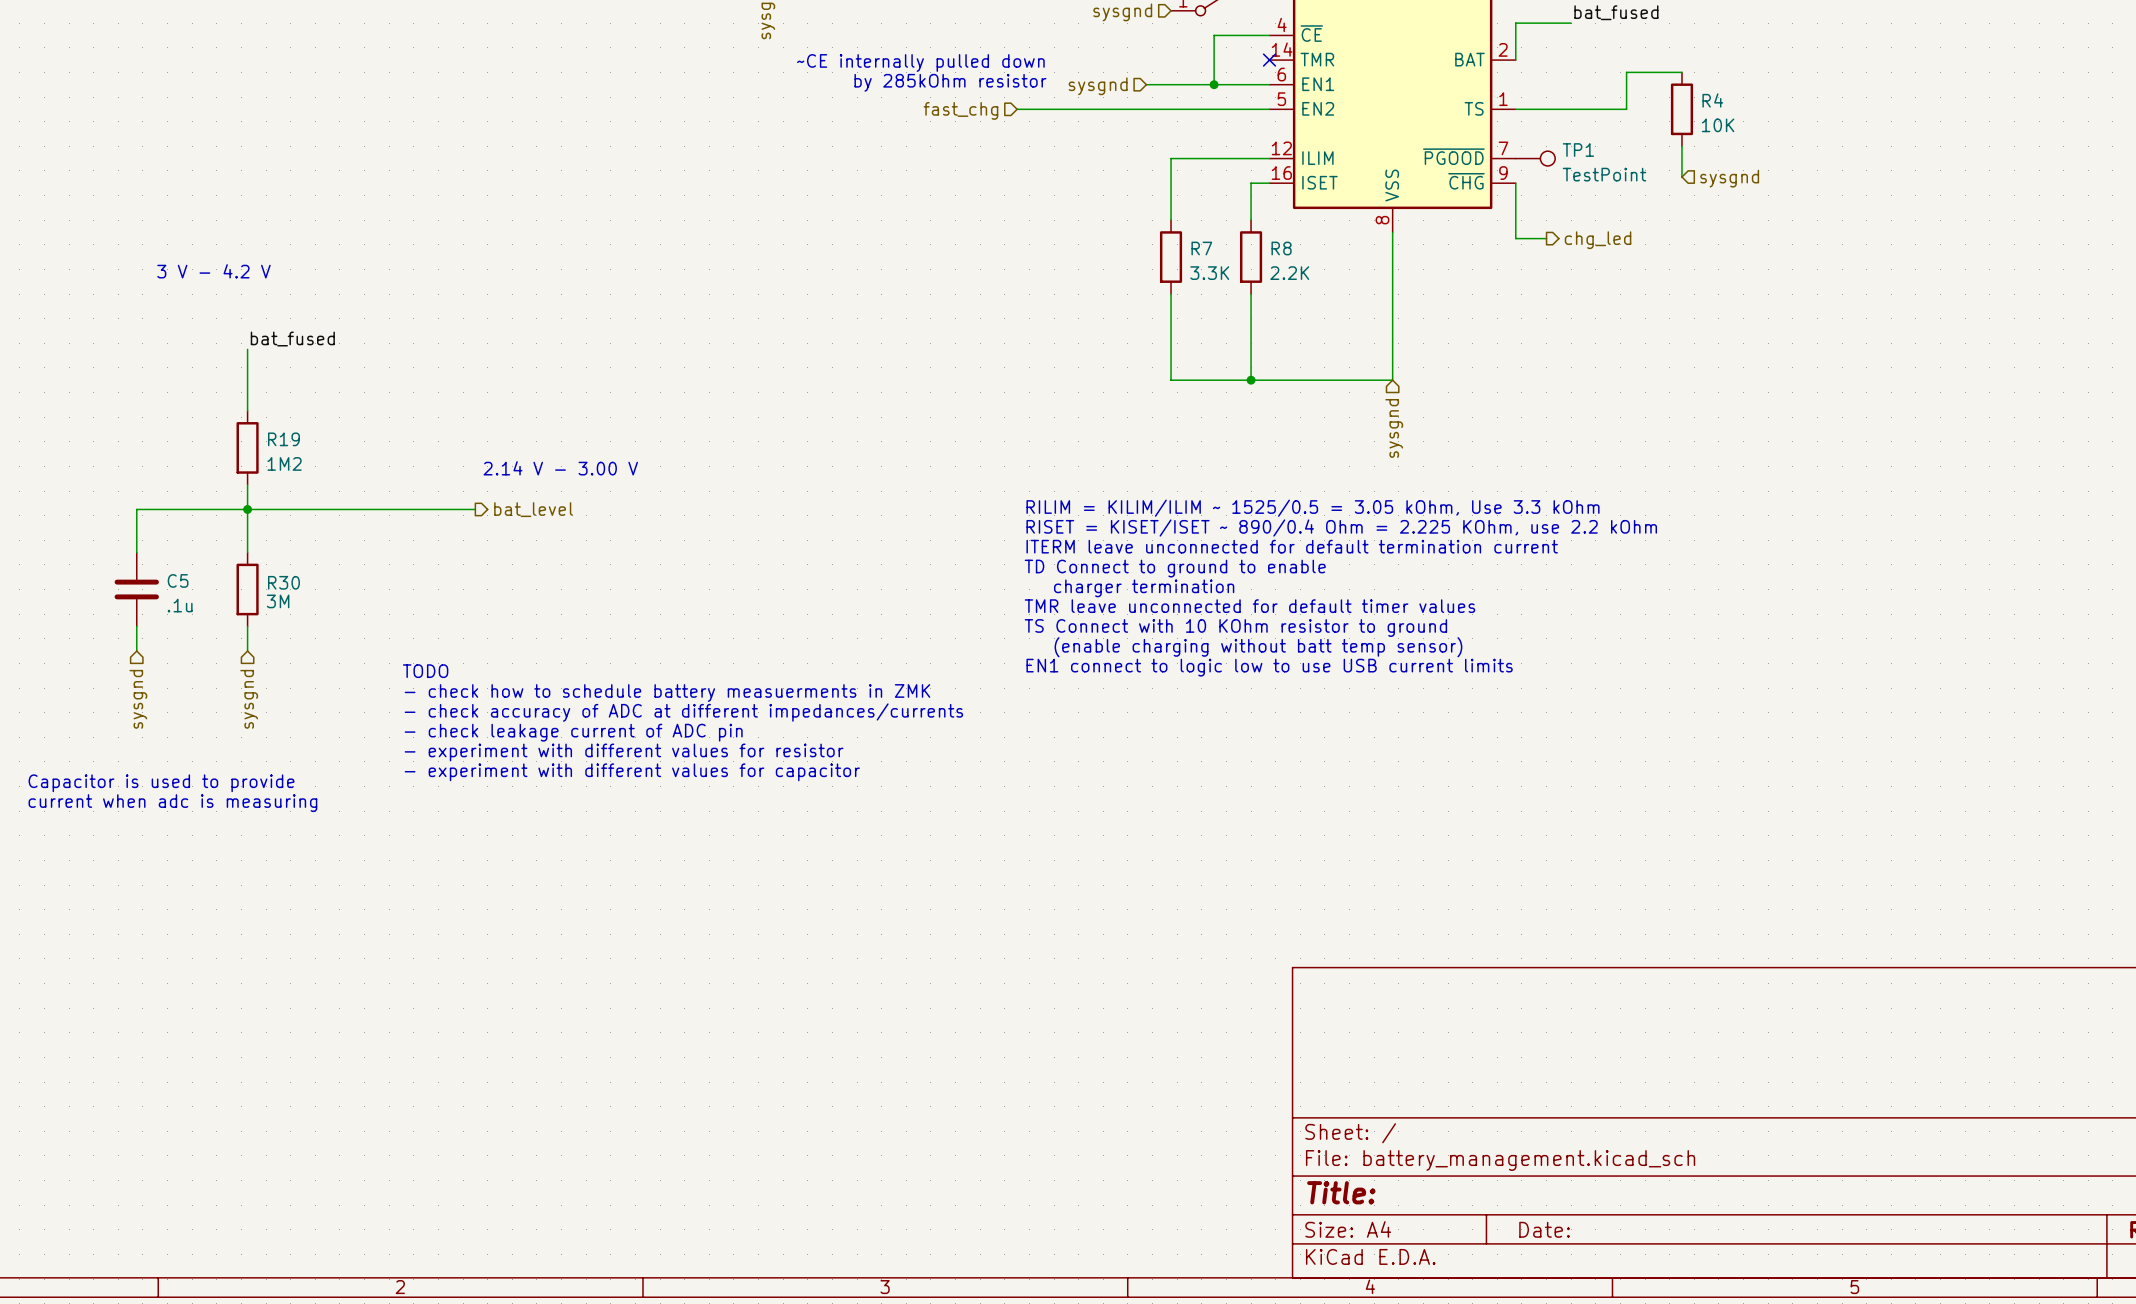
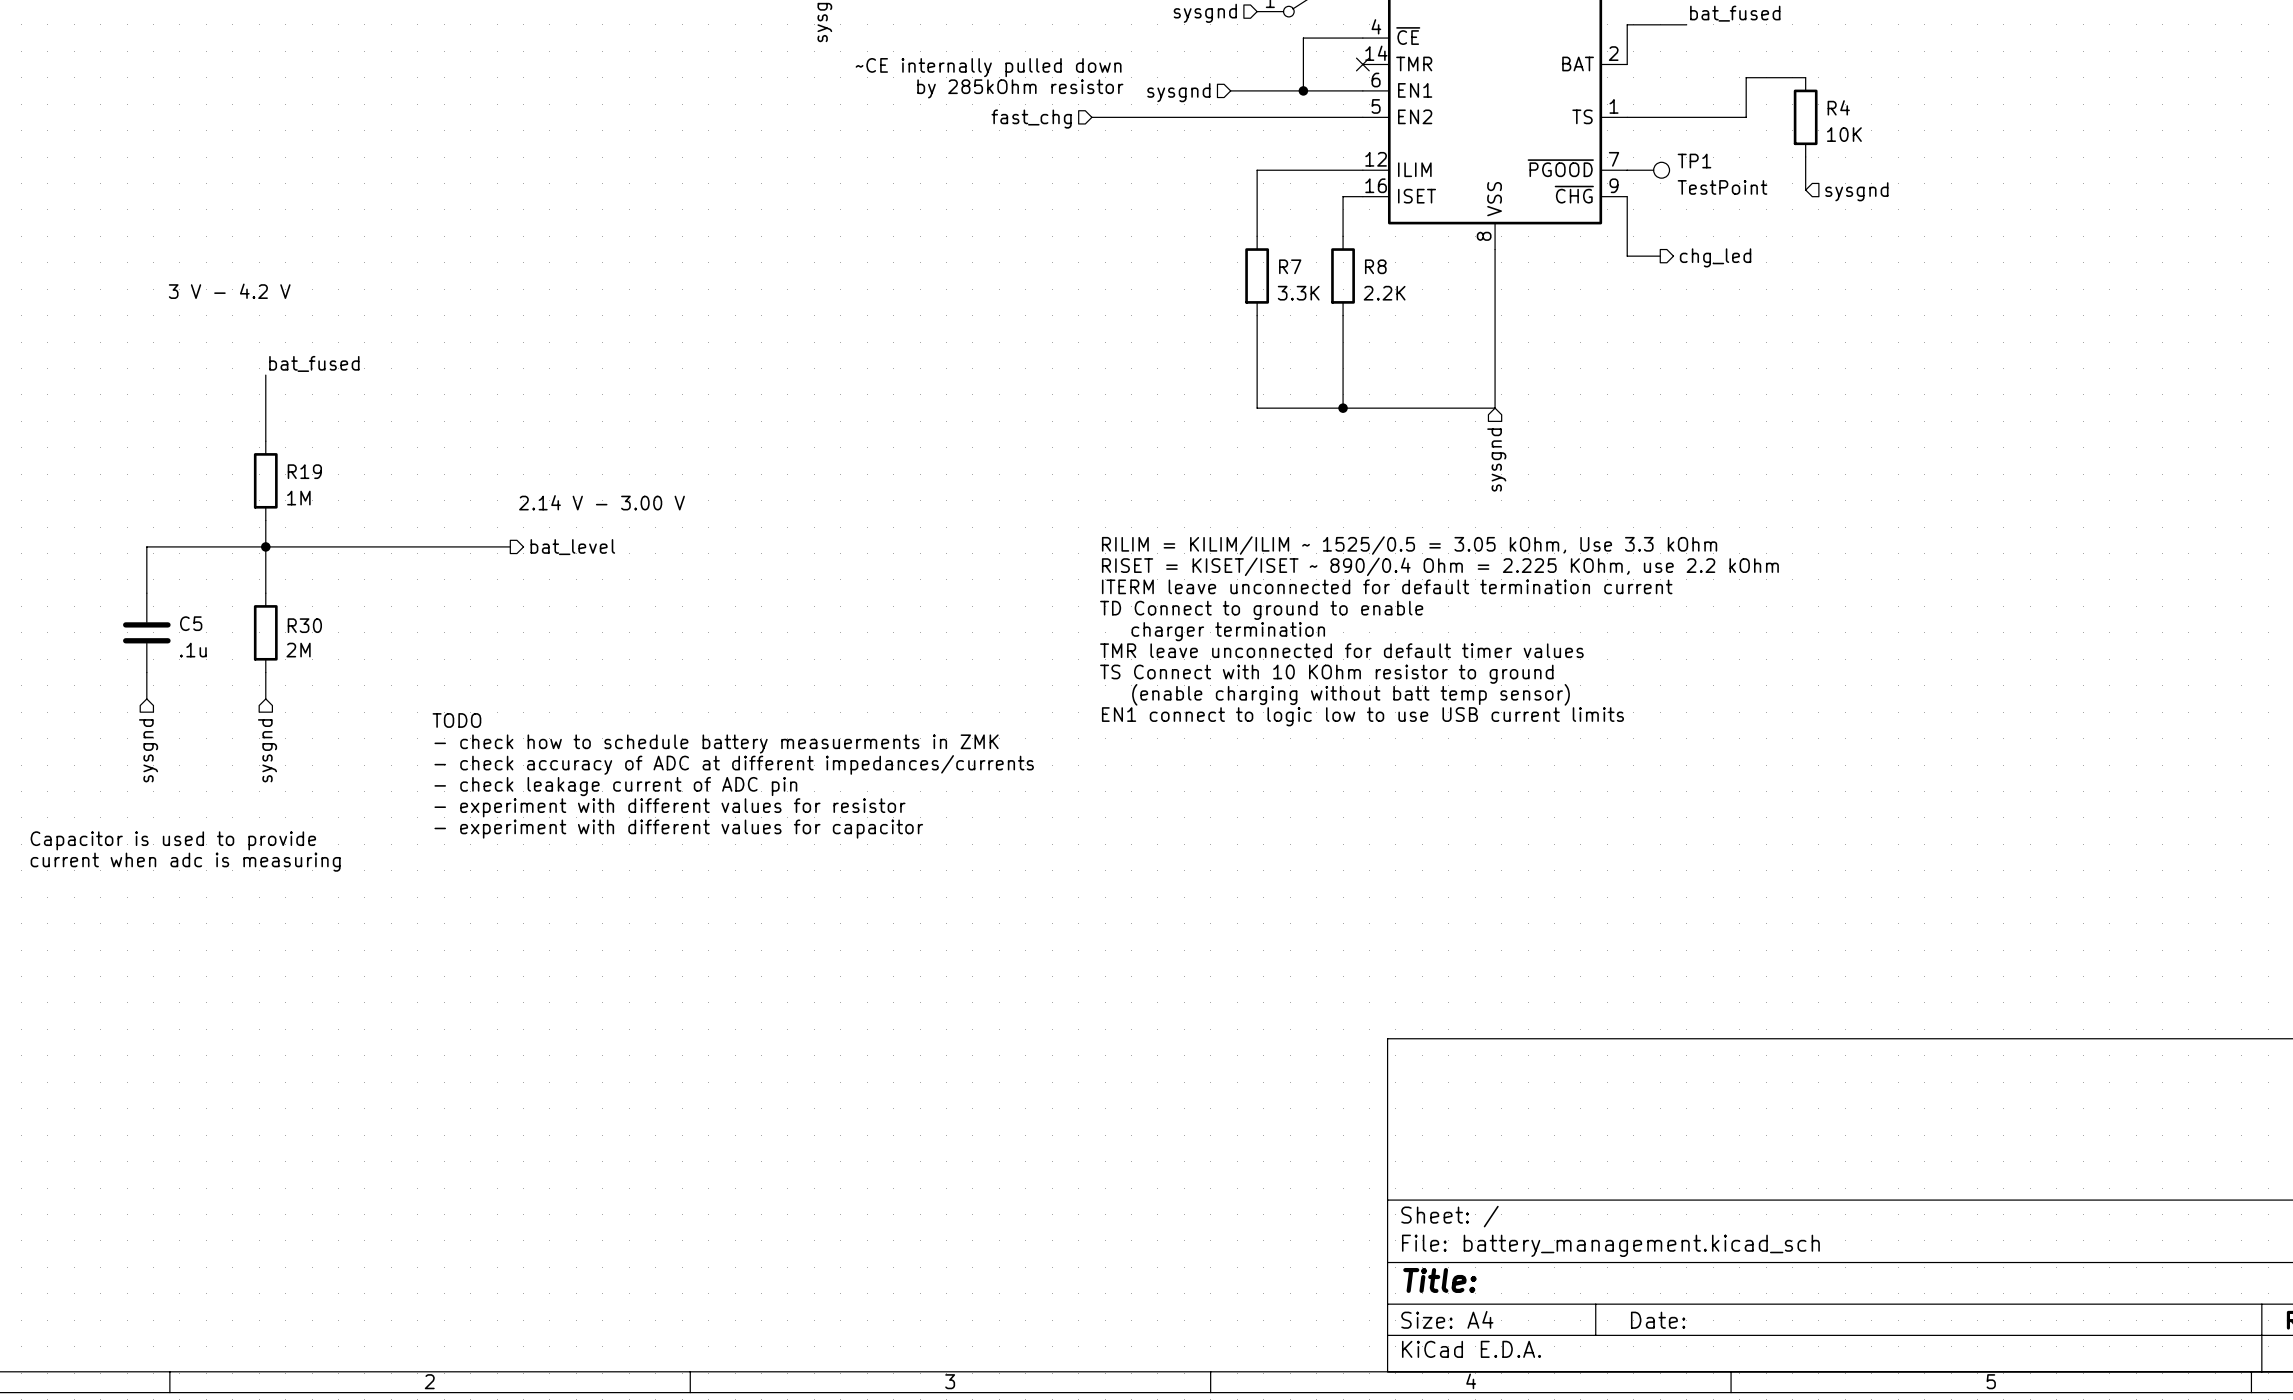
R19 value: 1M2 (284, 463) -> 1M (298, 498)
R30 value: 3M (278, 601) -> 2M (298, 650)

